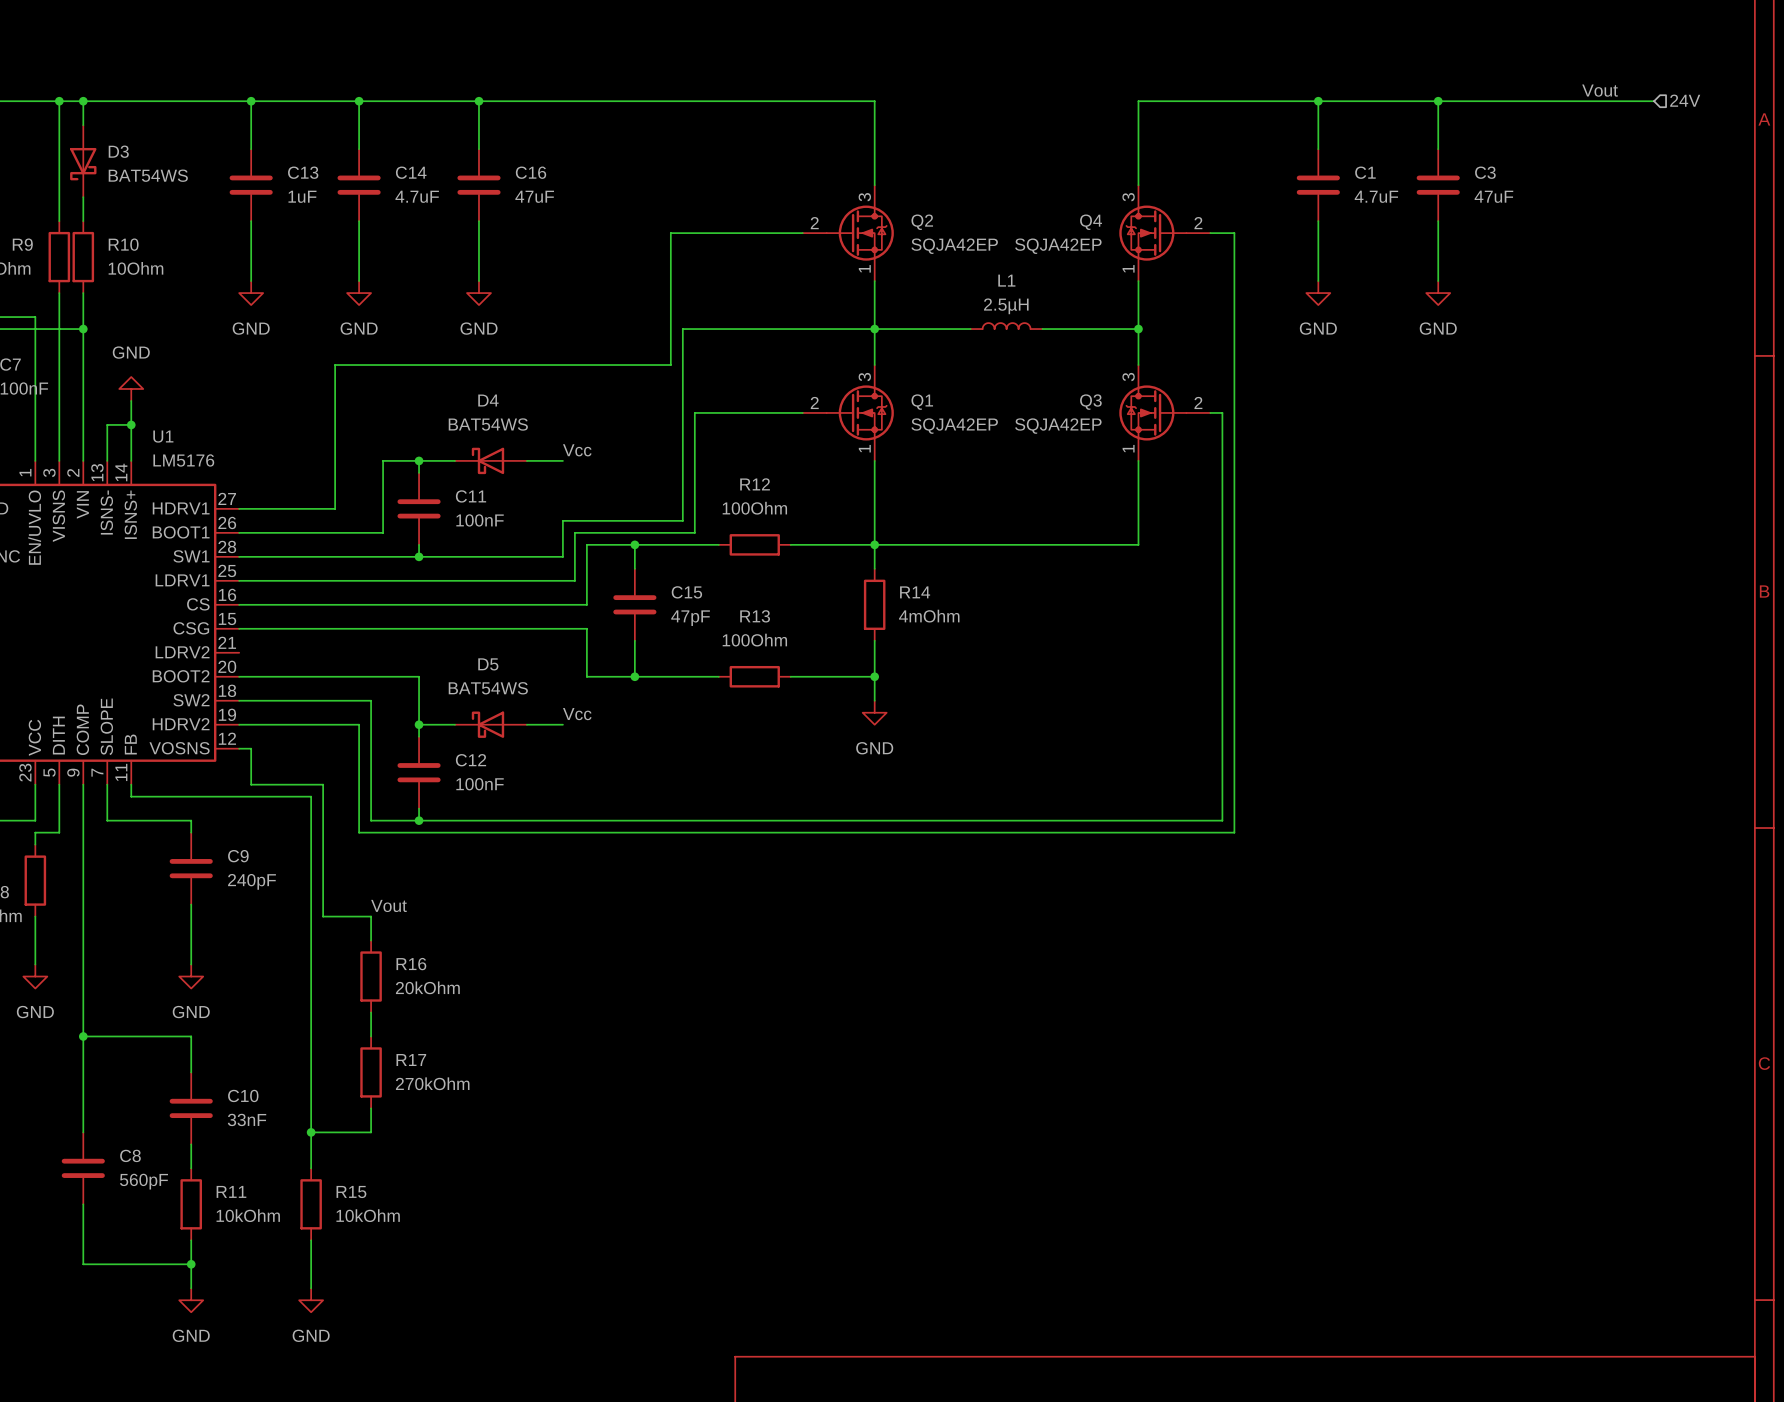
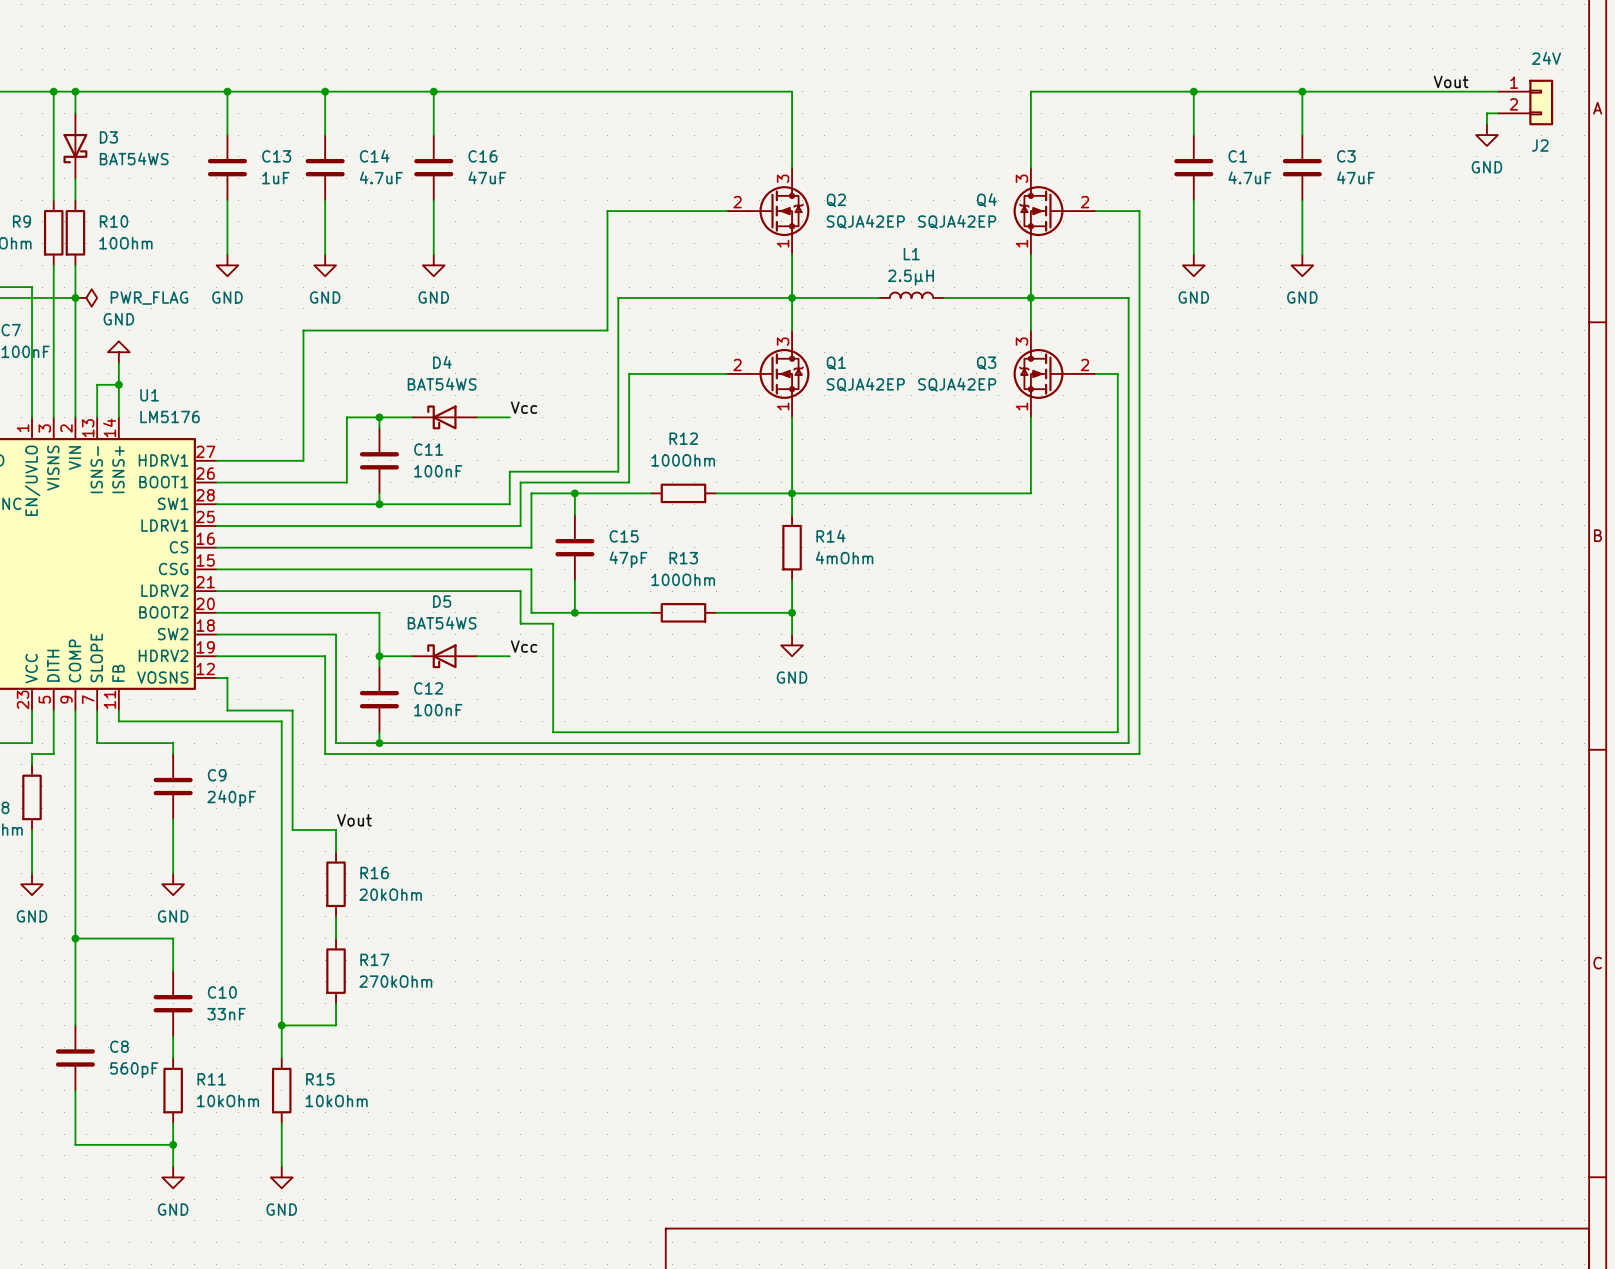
hierarchical label: 24V (1685, 100) -> none
J2: none -> 24V (1525, 102)
wire: none -> (1497, 113) (1486, 113) (1486, 124)
power symbol: none -> GND (1486, 135)
wire: (1234, 233) (1234, 412) -> (1106, 373) (1117, 373)
power symbol: none -> PWR_FLAG (86, 297)
wire: (1222, 412) (1222, 820) -> (1030, 297) (1128, 297) (1128, 743) (1106, 743)
wire: none -> (216, 591) (520, 591) (520, 623) (553, 623) (553, 732) (1117, 732)
wire: (1234, 808) (1234, 832) -> (1117, 211) (1139, 211) (1139, 753) (1117, 753)

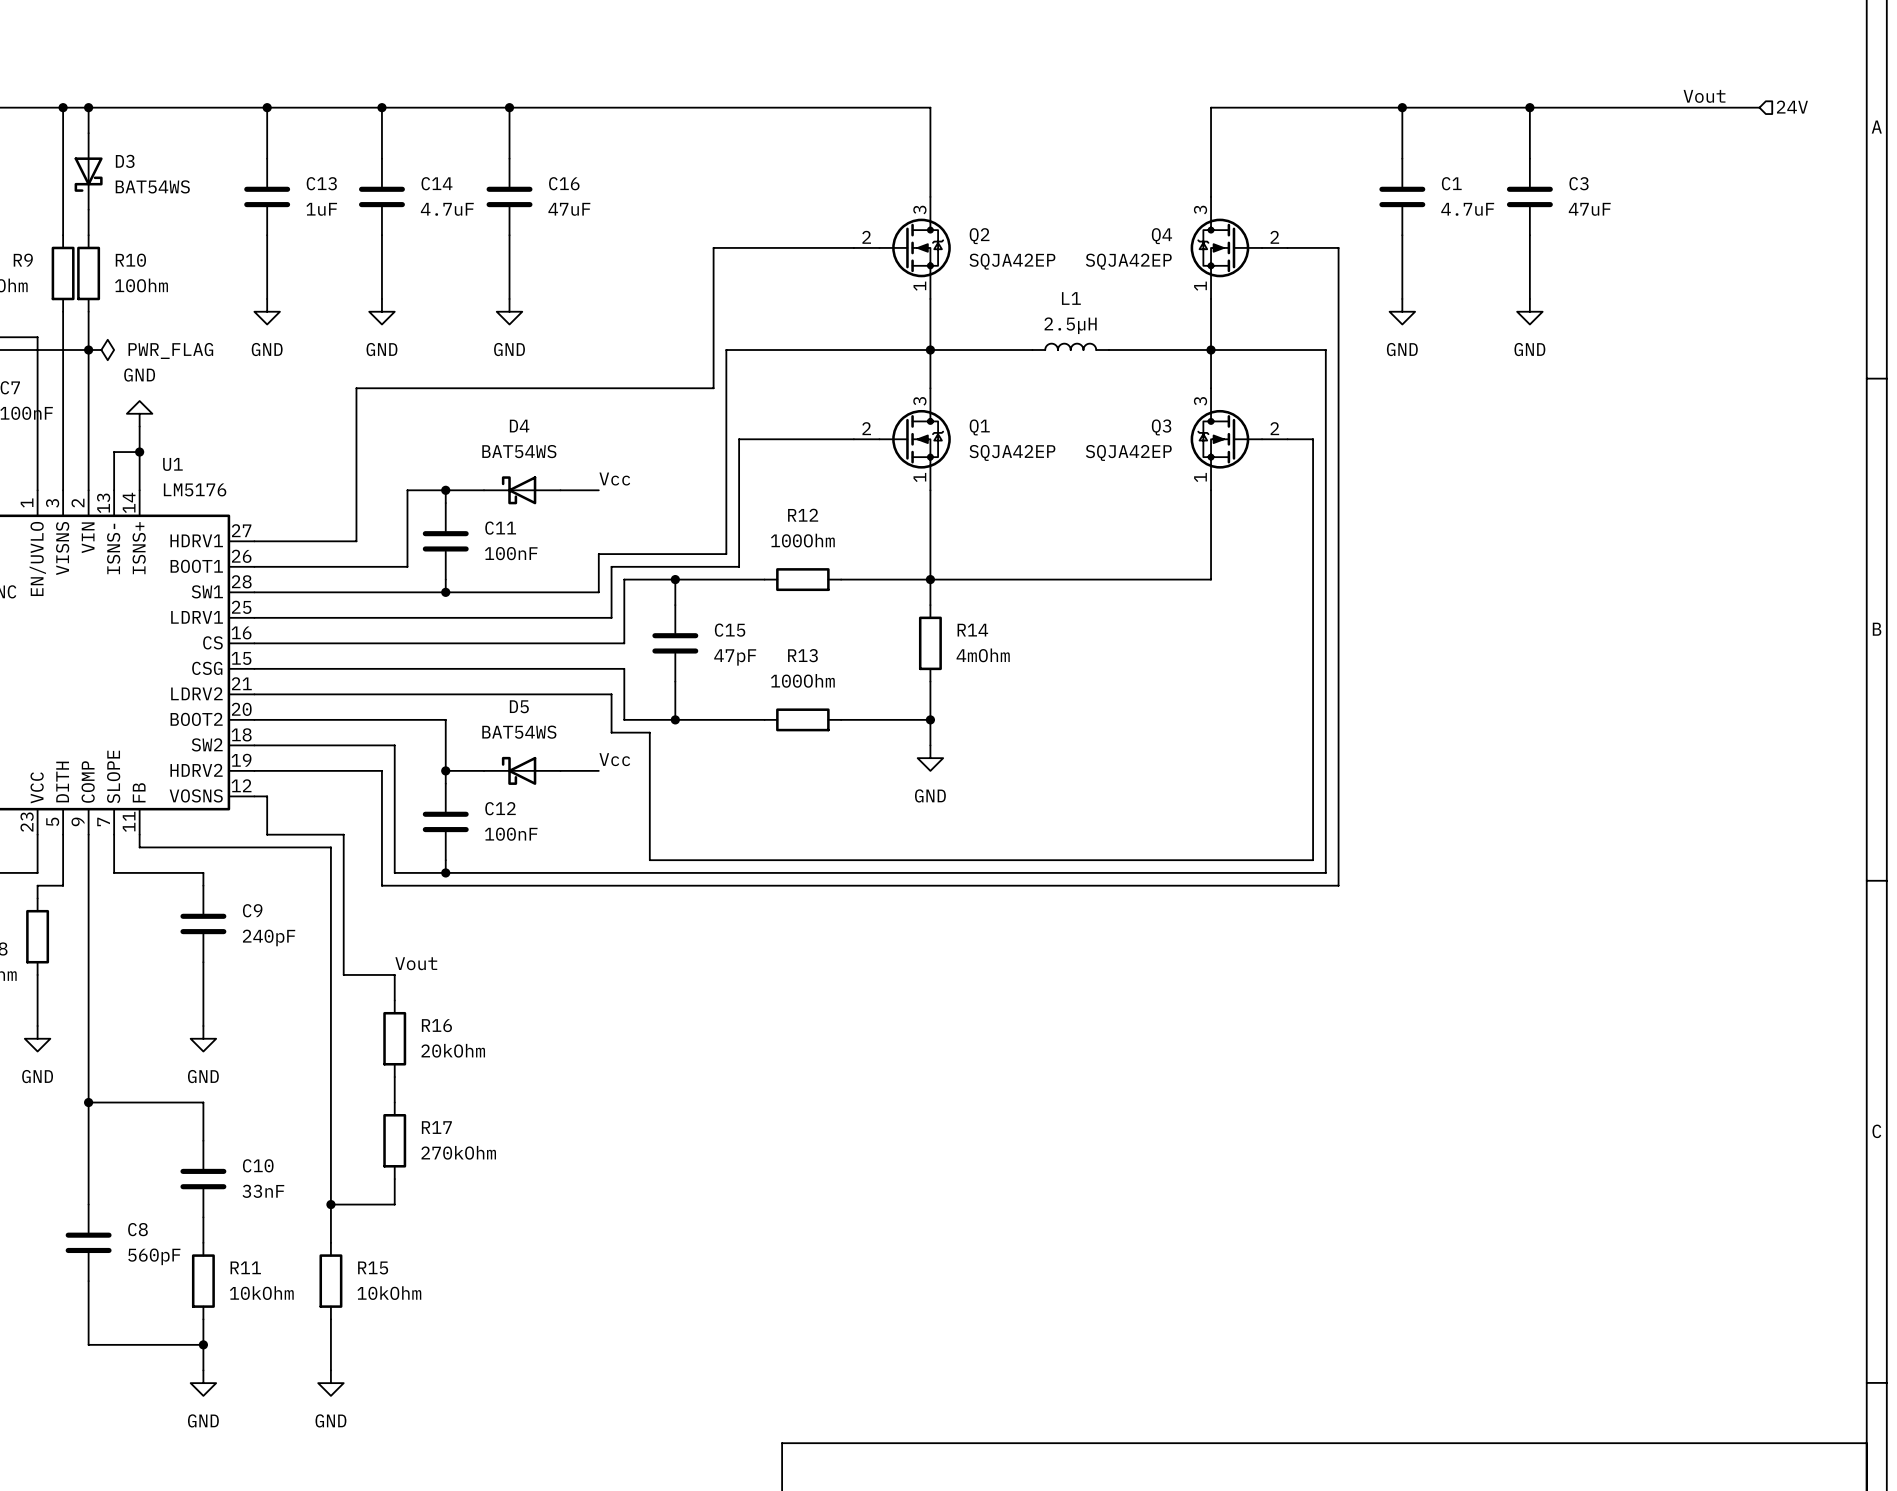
hierarchical label: none -> 24V (1792, 107)
J2: 24V (1525, 102) -> none
wire: (1497, 113) (1486, 113) (1486, 124) -> none
power symbol: GND (1486, 135) -> none

